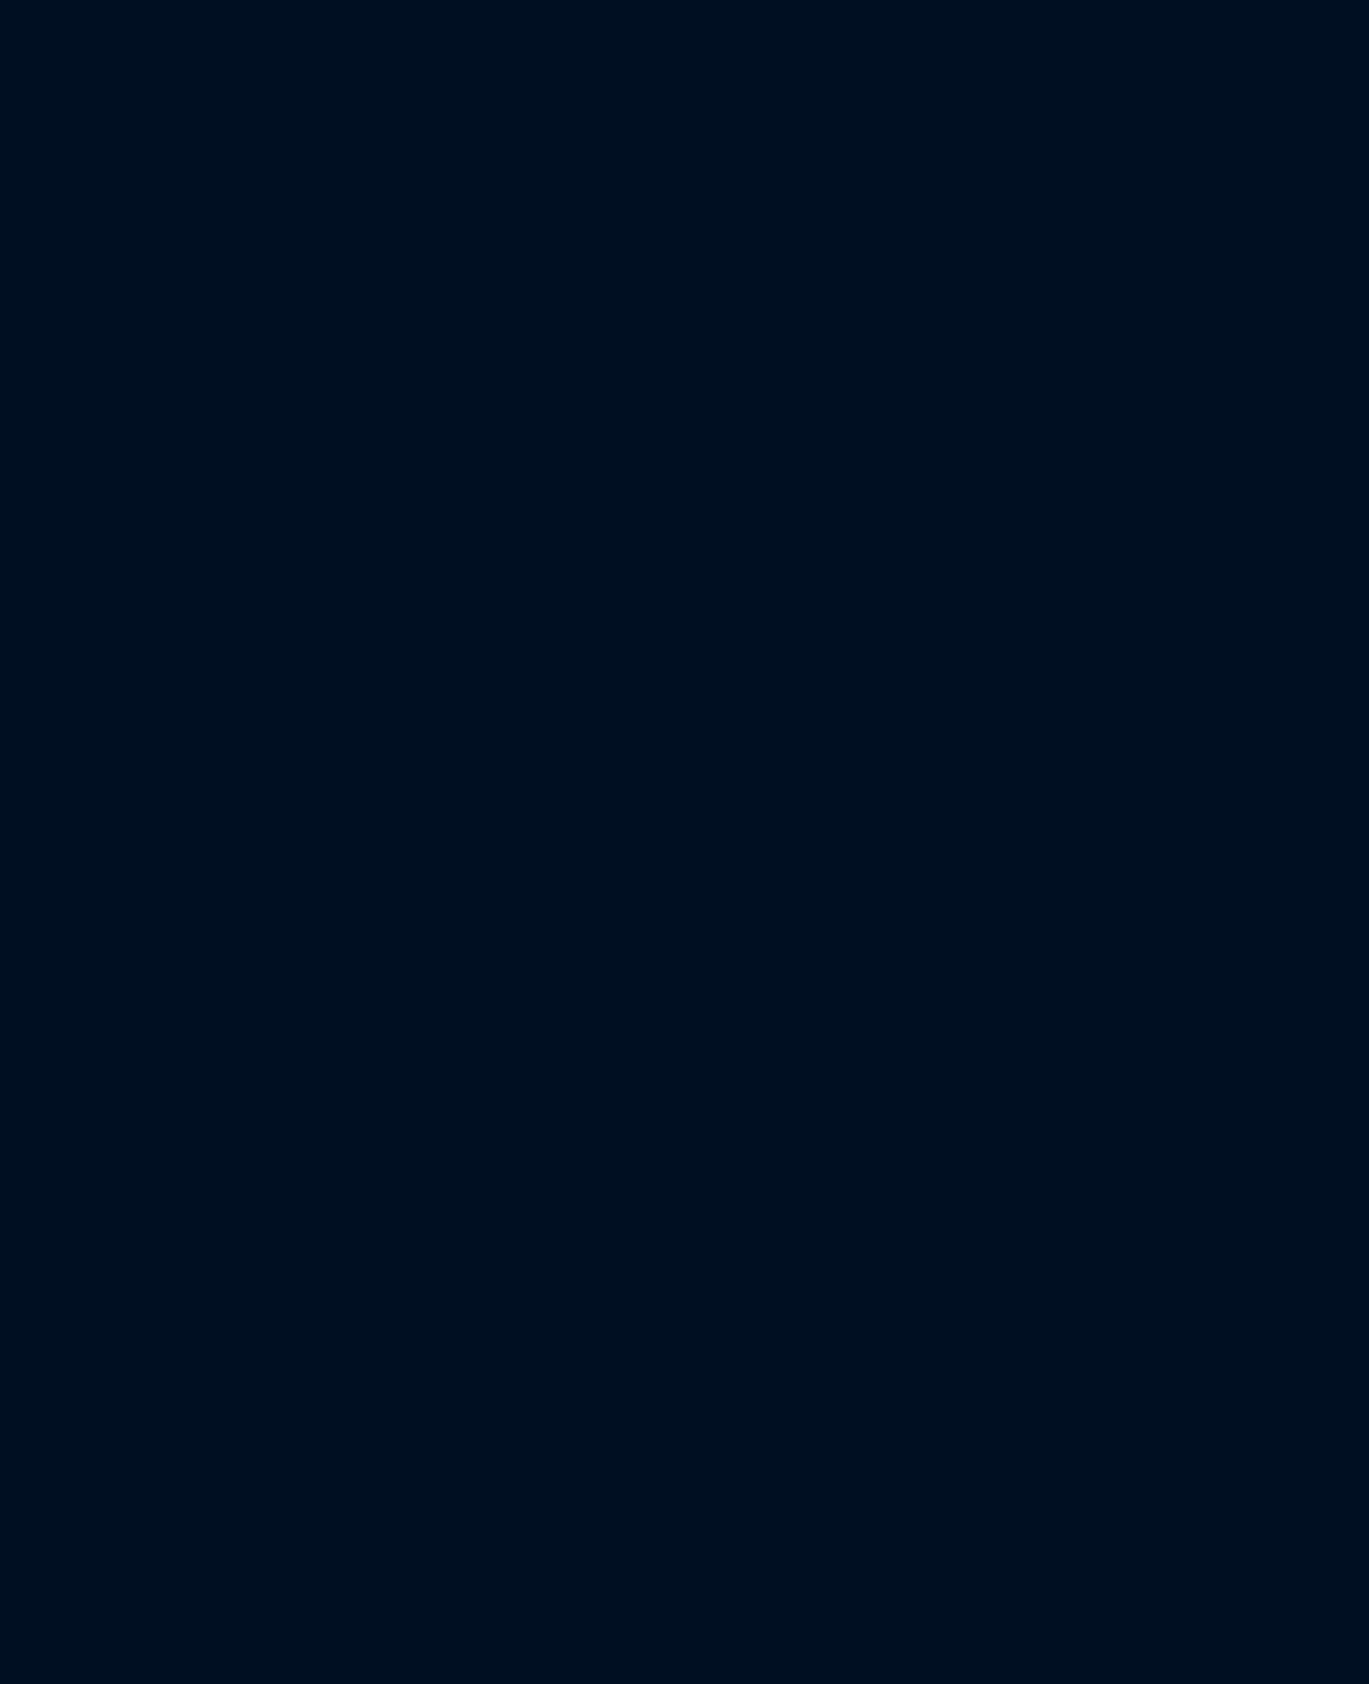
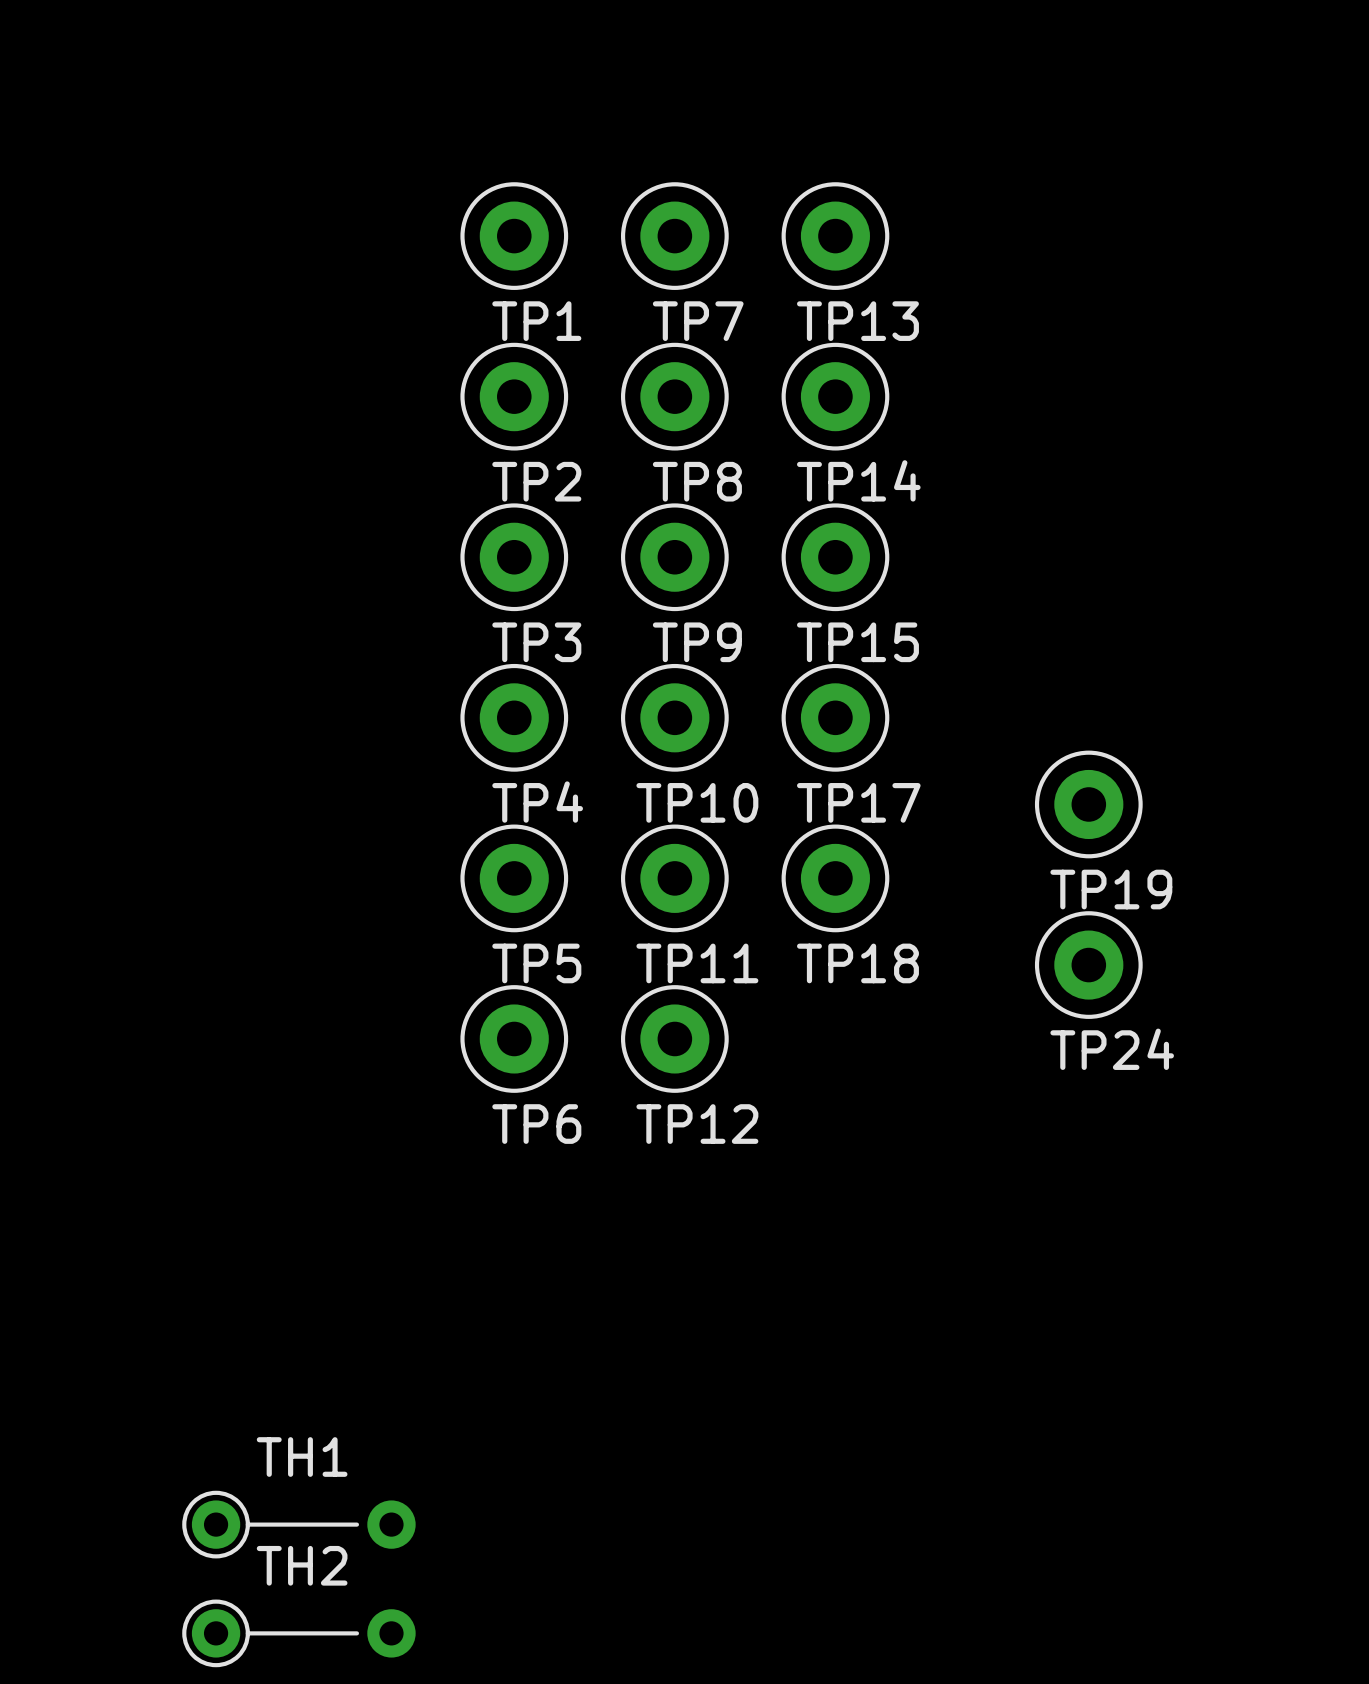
TP1: none -> (514, 236)
TP7: none -> (674, 236)
TP13: none -> (835, 236)
TP2: none -> (514, 396)
TP8: none -> (674, 396)
TP14: none -> (835, 396)
TP3: none -> (514, 557)
TP9: none -> (674, 557)
TP15: none -> (835, 557)
TP4: none -> (514, 717)
TP10: none -> (674, 717)
TP17: none -> (835, 717)
TP19: none -> (1088, 804)
TP5: none -> (514, 878)
TP11: none -> (674, 878)
TP18: none -> (835, 878)
TP24: none -> (1088, 965)
TP6: none -> (514, 1038)
TP12: none -> (674, 1038)
TH1: none -> (298, 1524)
TH2: none -> (298, 1633)

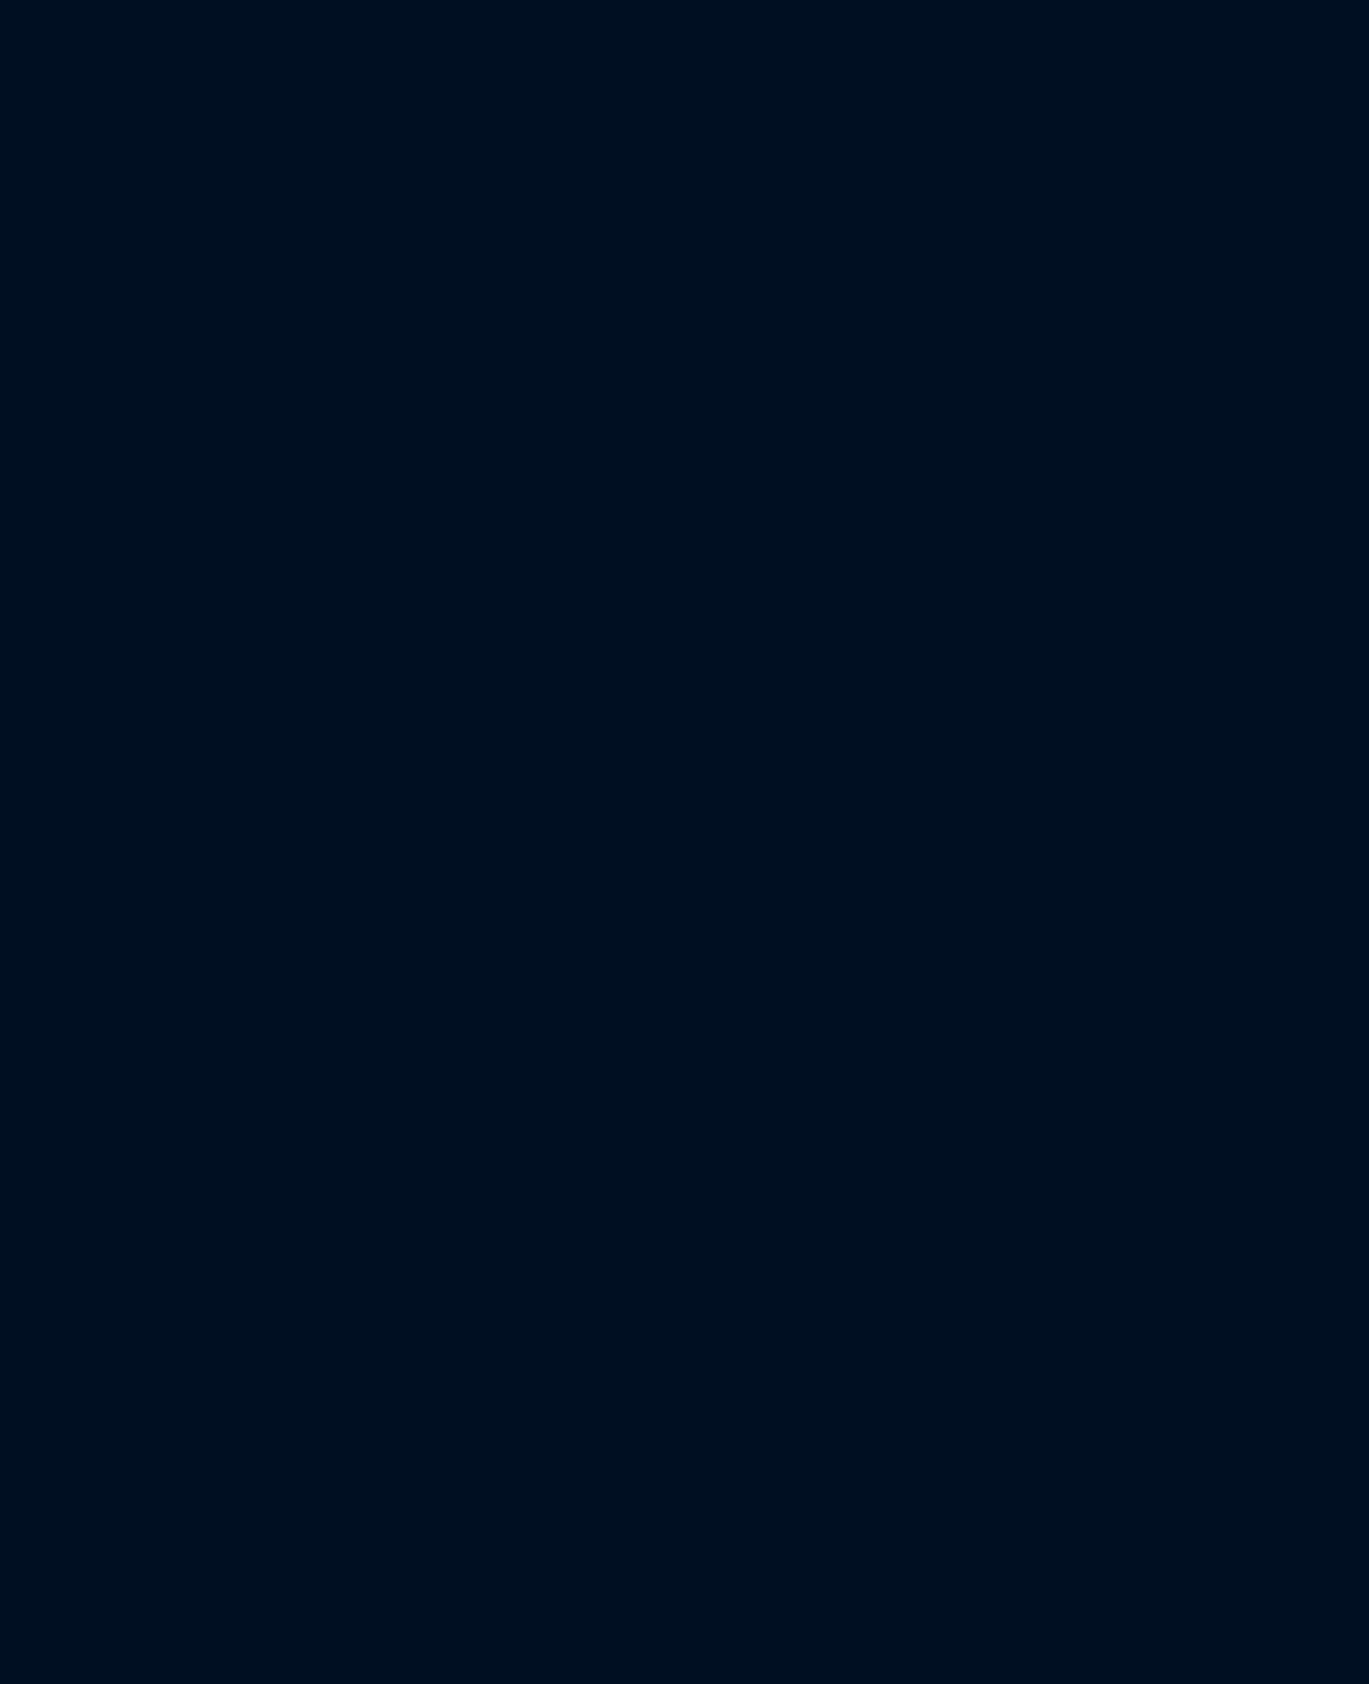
TP1: (514, 236) -> none
TP7: (674, 236) -> none
TP13: (835, 236) -> none
TP2: (514, 396) -> none
TP8: (674, 396) -> none
TP14: (835, 396) -> none
TP3: (514, 557) -> none
TP9: (674, 557) -> none
TP15: (835, 557) -> none
TP4: (514, 717) -> none
TP10: (674, 717) -> none
TP17: (835, 717) -> none
TP19: (1088, 804) -> none
TP5: (514, 878) -> none
TP11: (674, 878) -> none
TP18: (835, 878) -> none
TP24: (1088, 965) -> none
TP6: (514, 1038) -> none
TP12: (674, 1038) -> none
TH1: (298, 1524) -> none
TH2: (298, 1633) -> none

